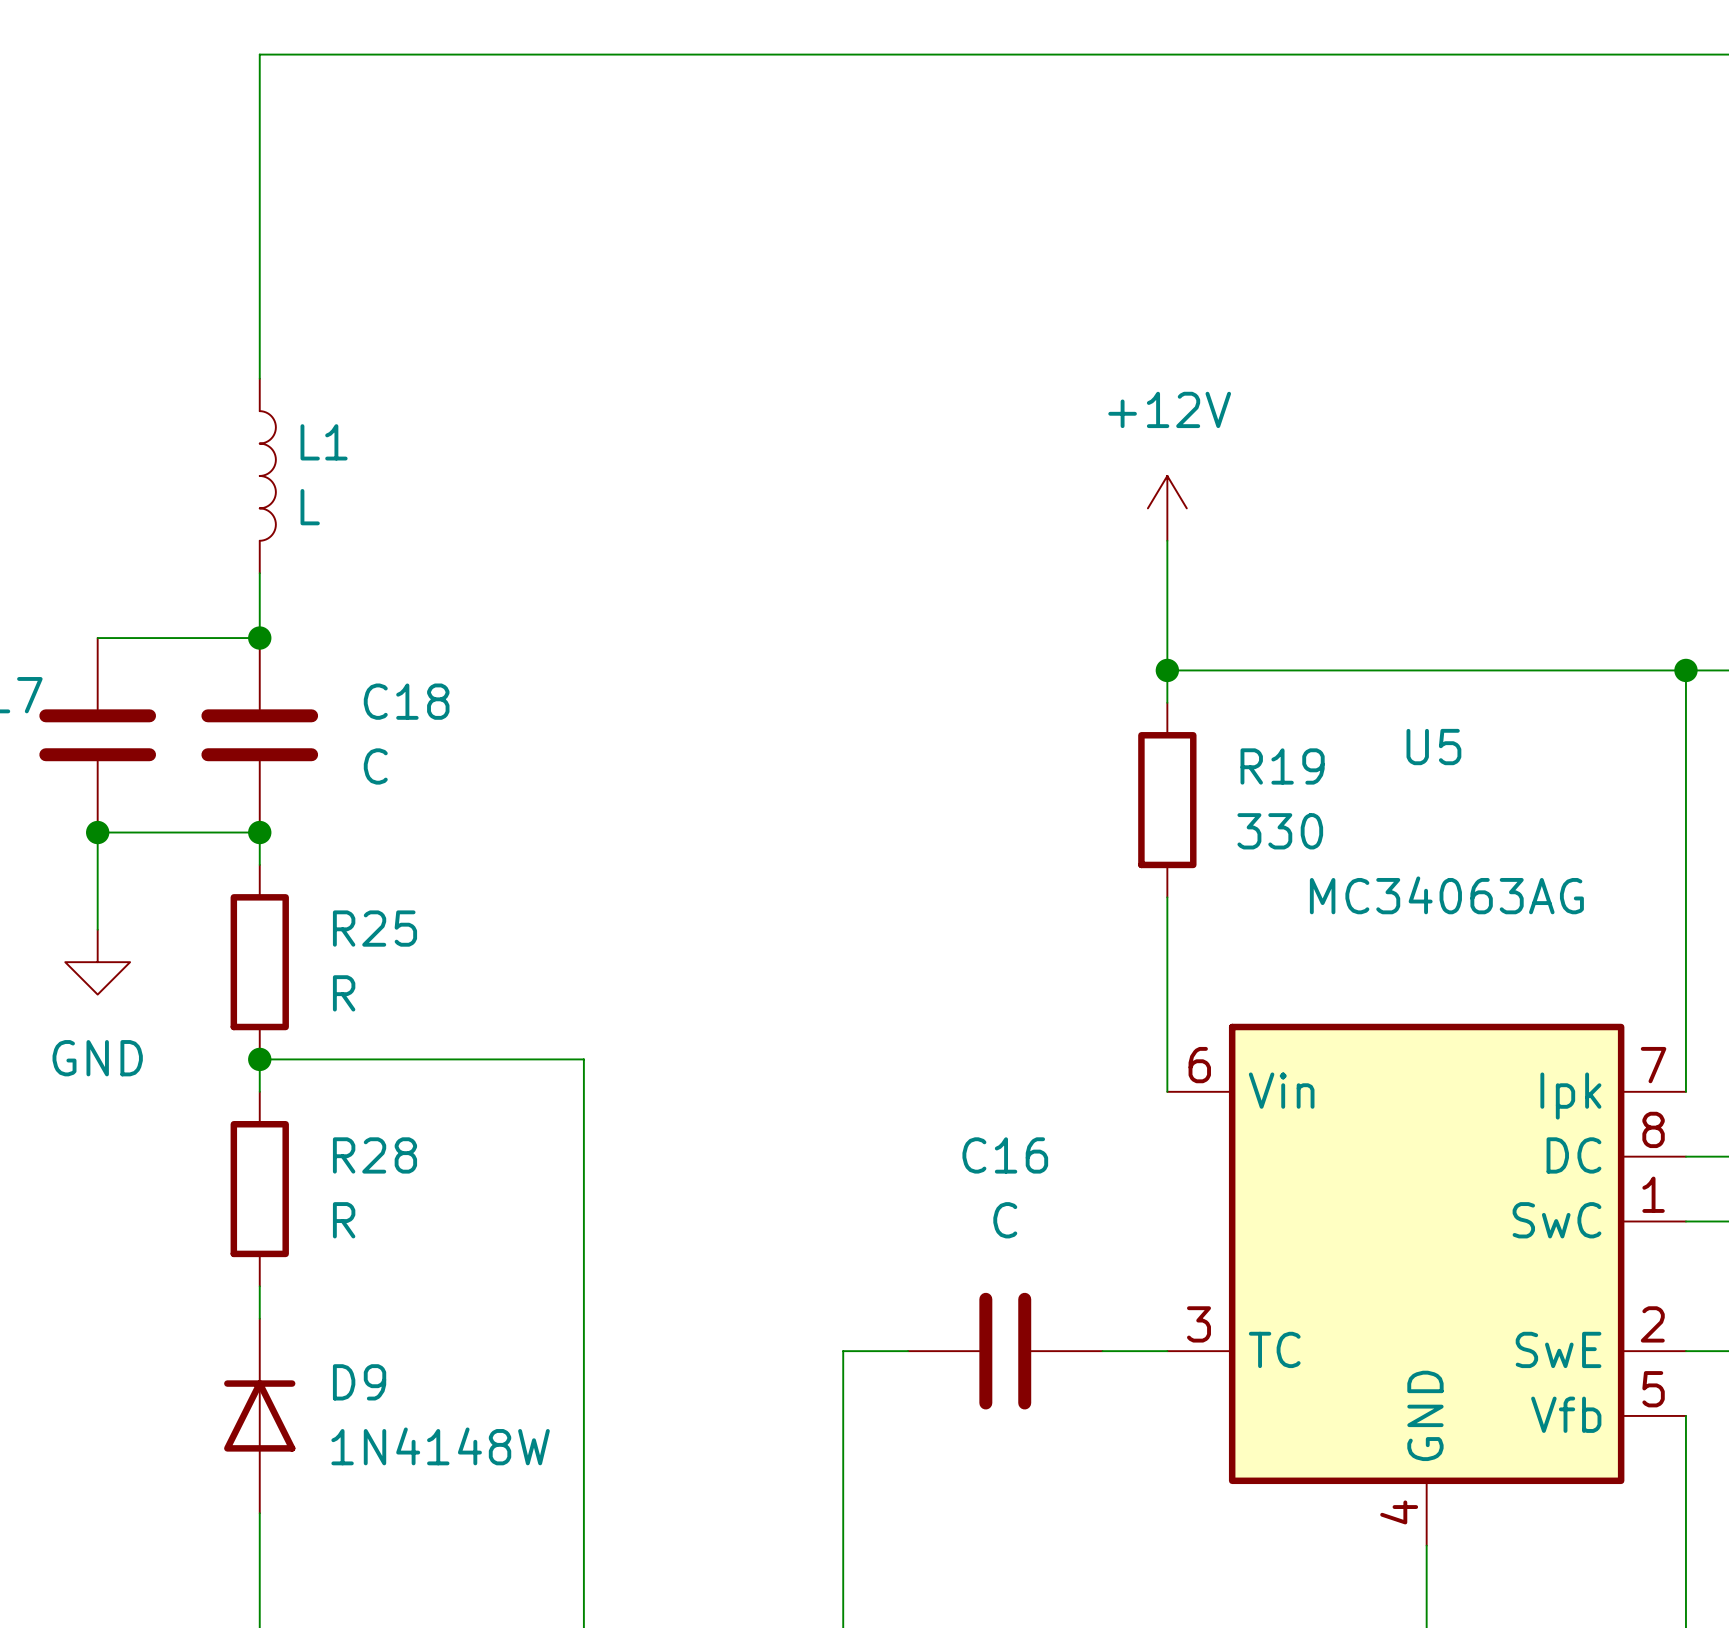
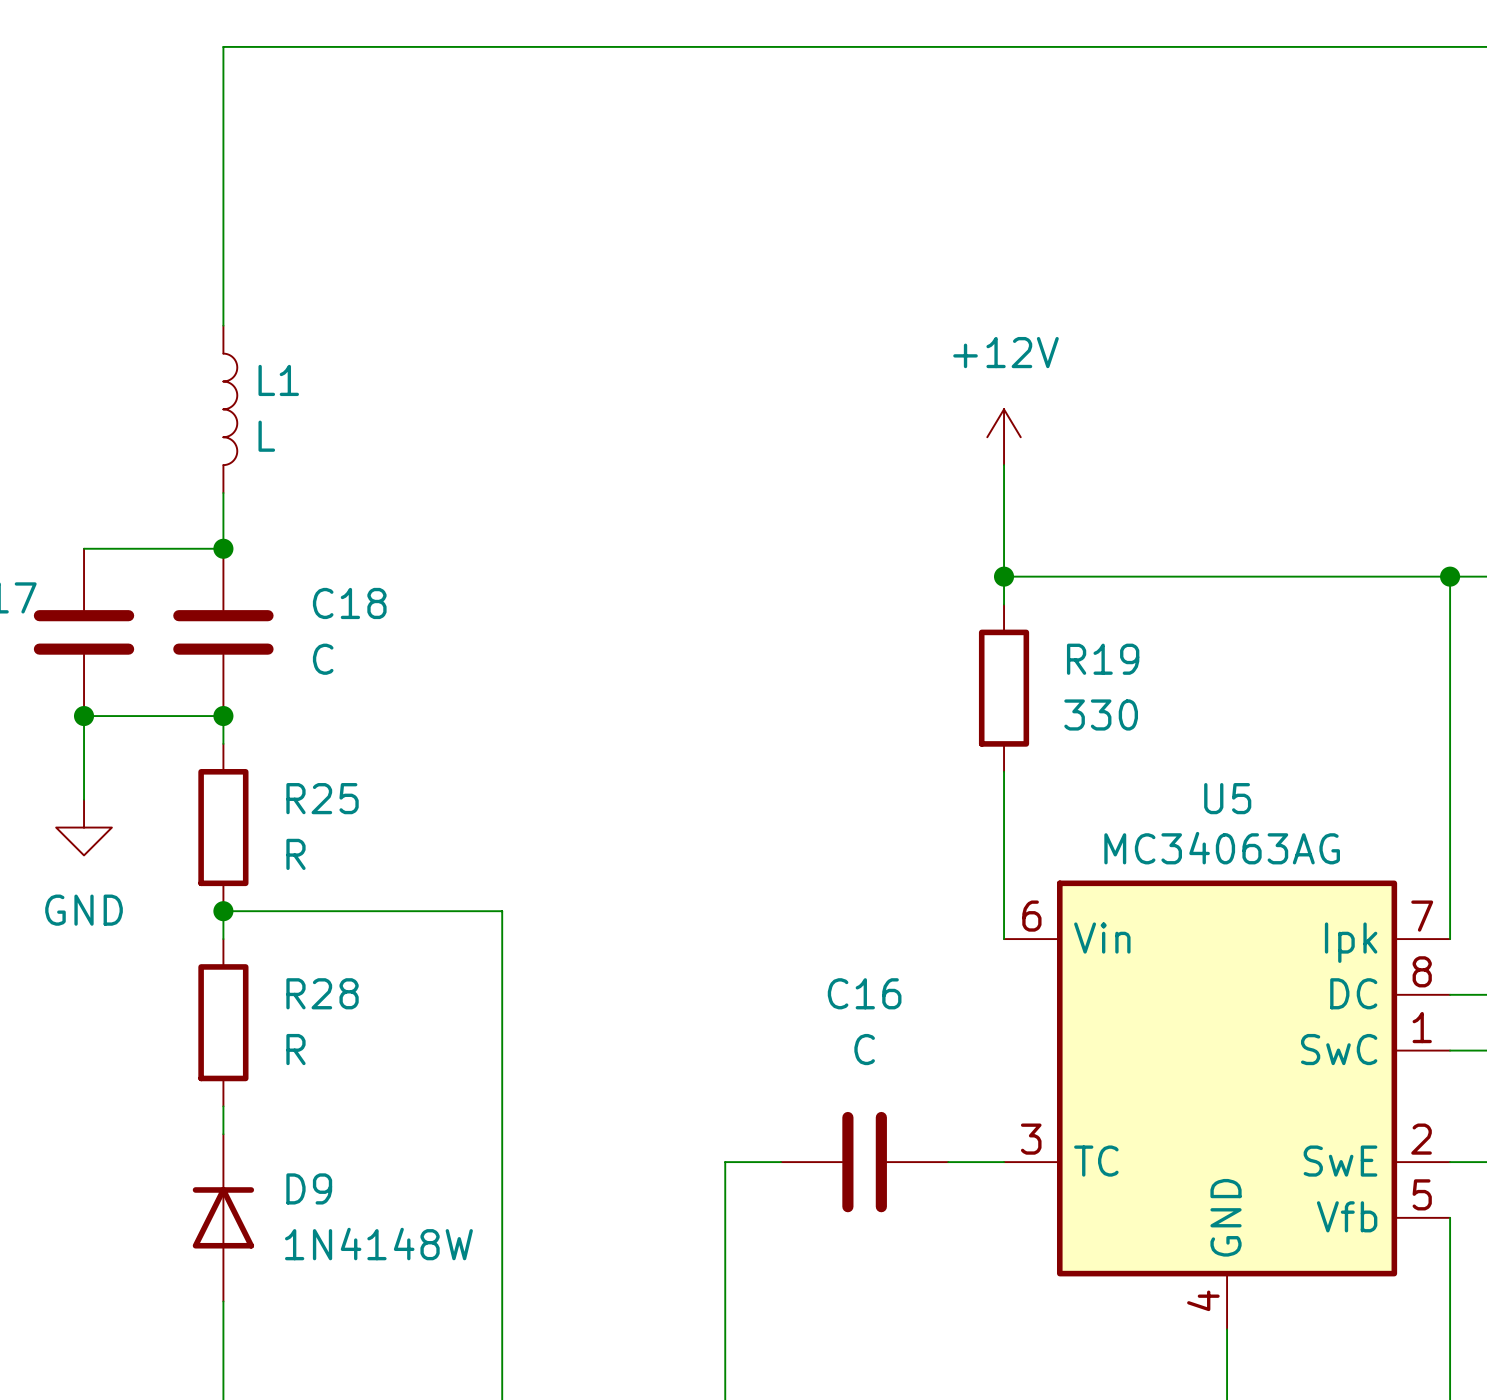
U5 name position: U5 (1433, 747) -> U5 (1227, 798)
U5 value position: MC34063AG (1446, 895) -> MC34063AG (1222, 848)

